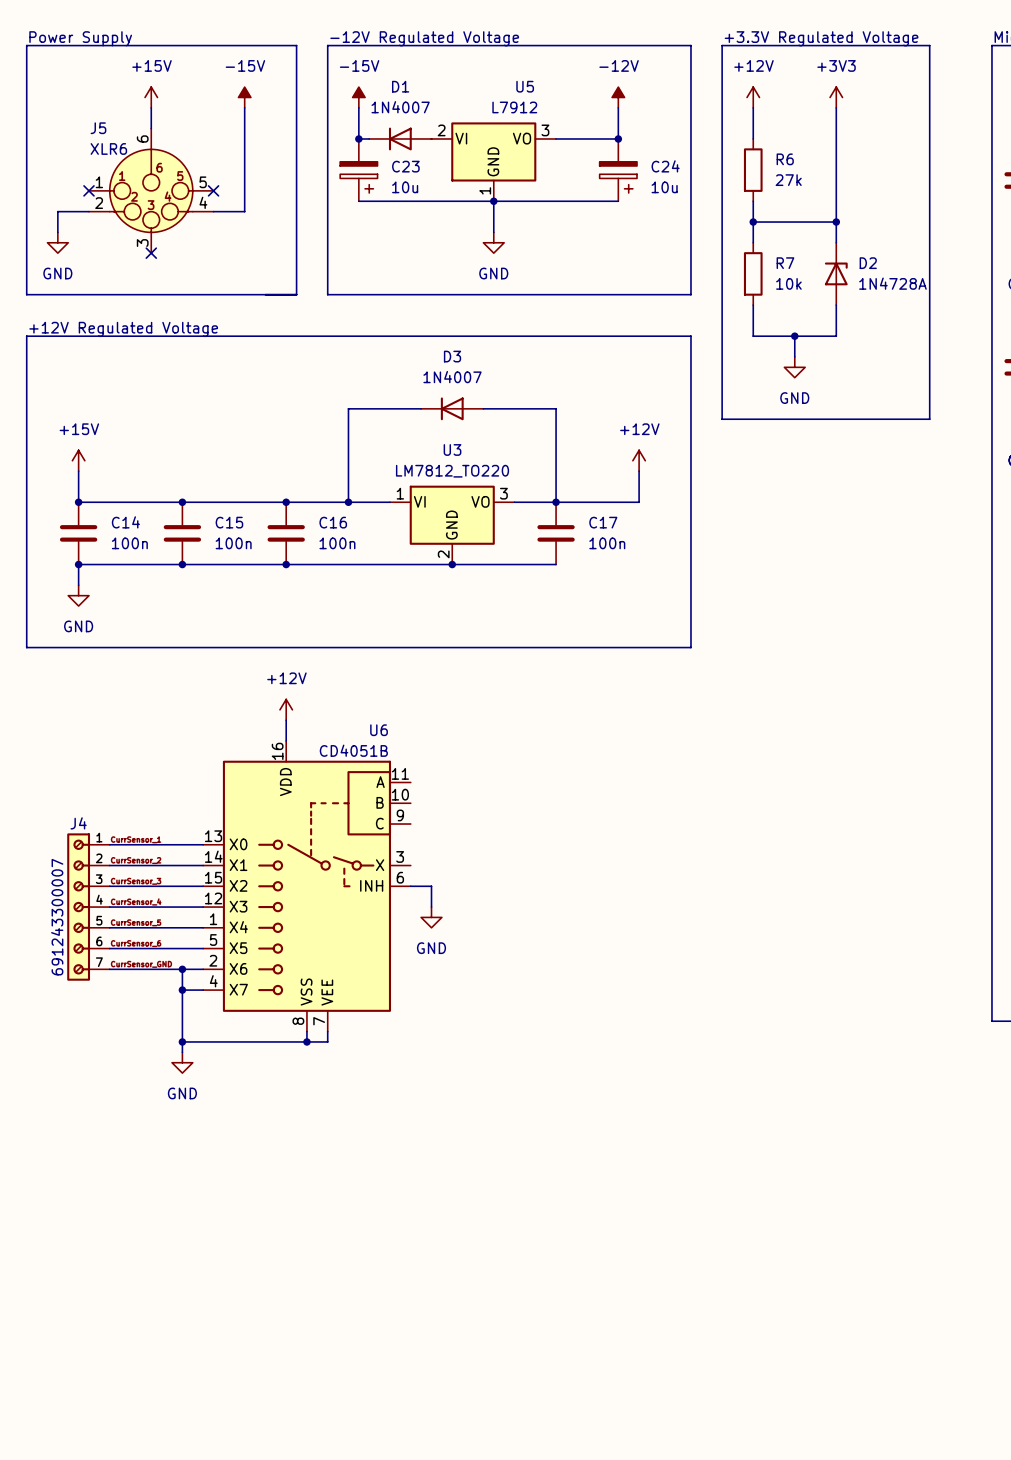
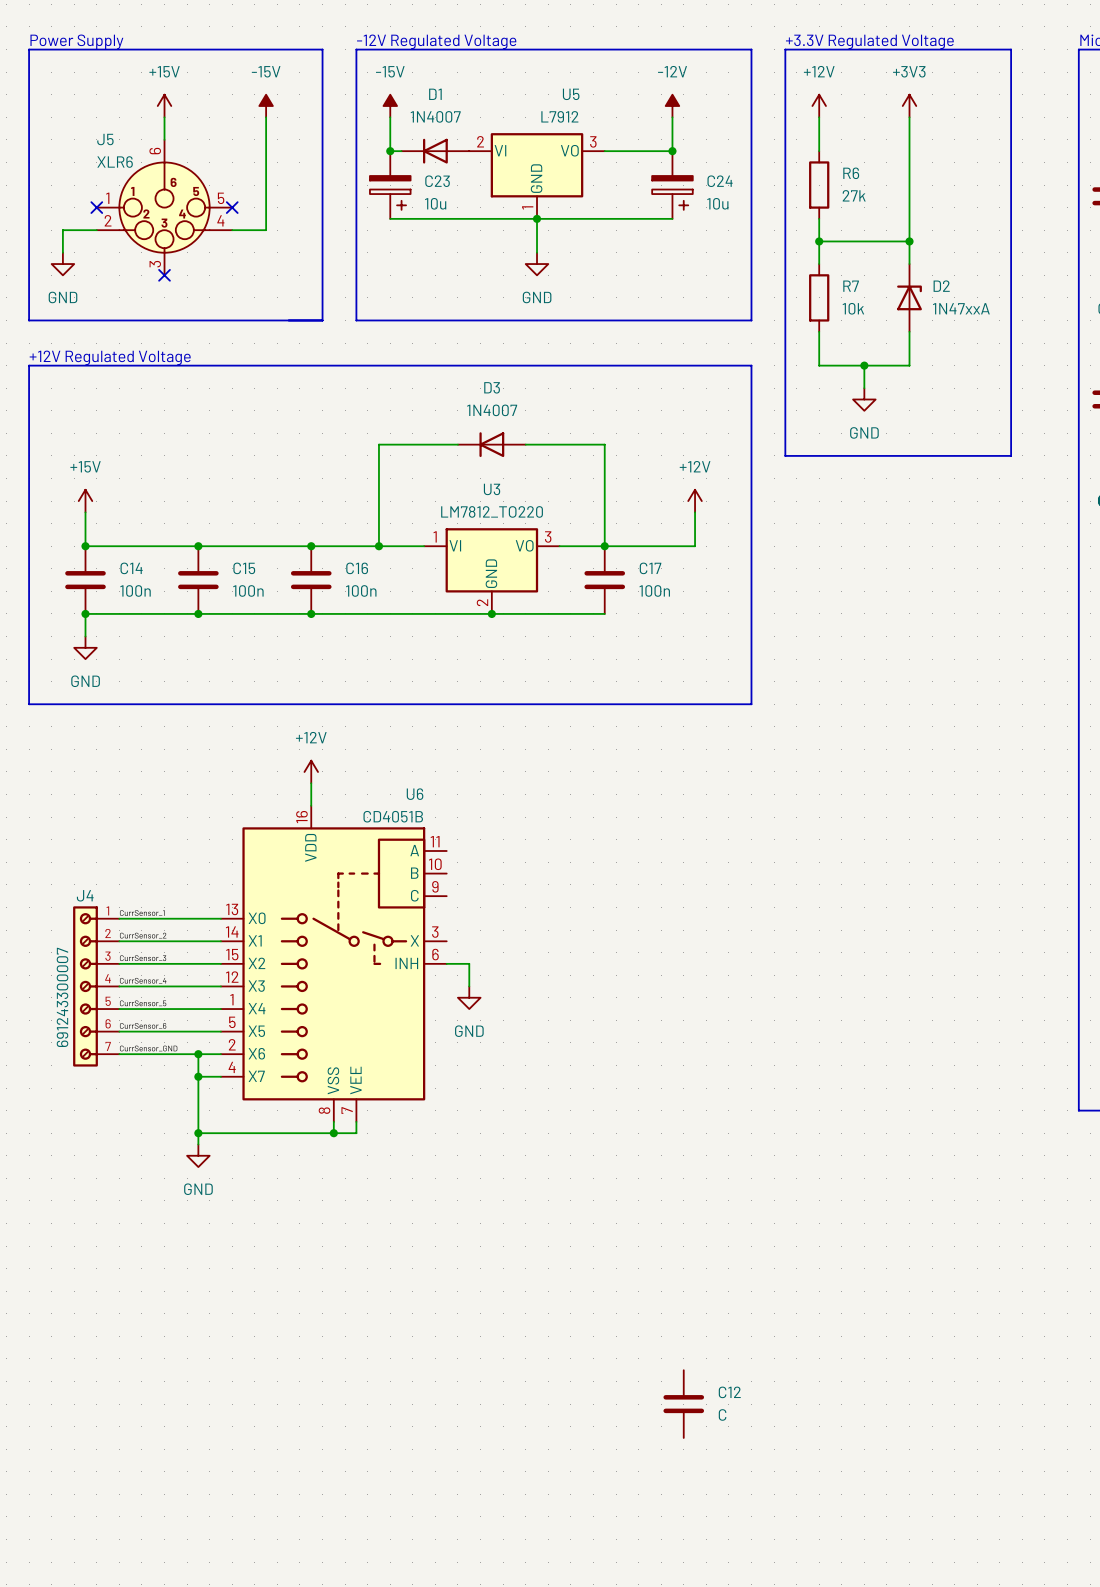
D2 value: 1N4728A (892, 283) -> 1N47xxA (961, 308)
C12: none -> C (683, 1404)

